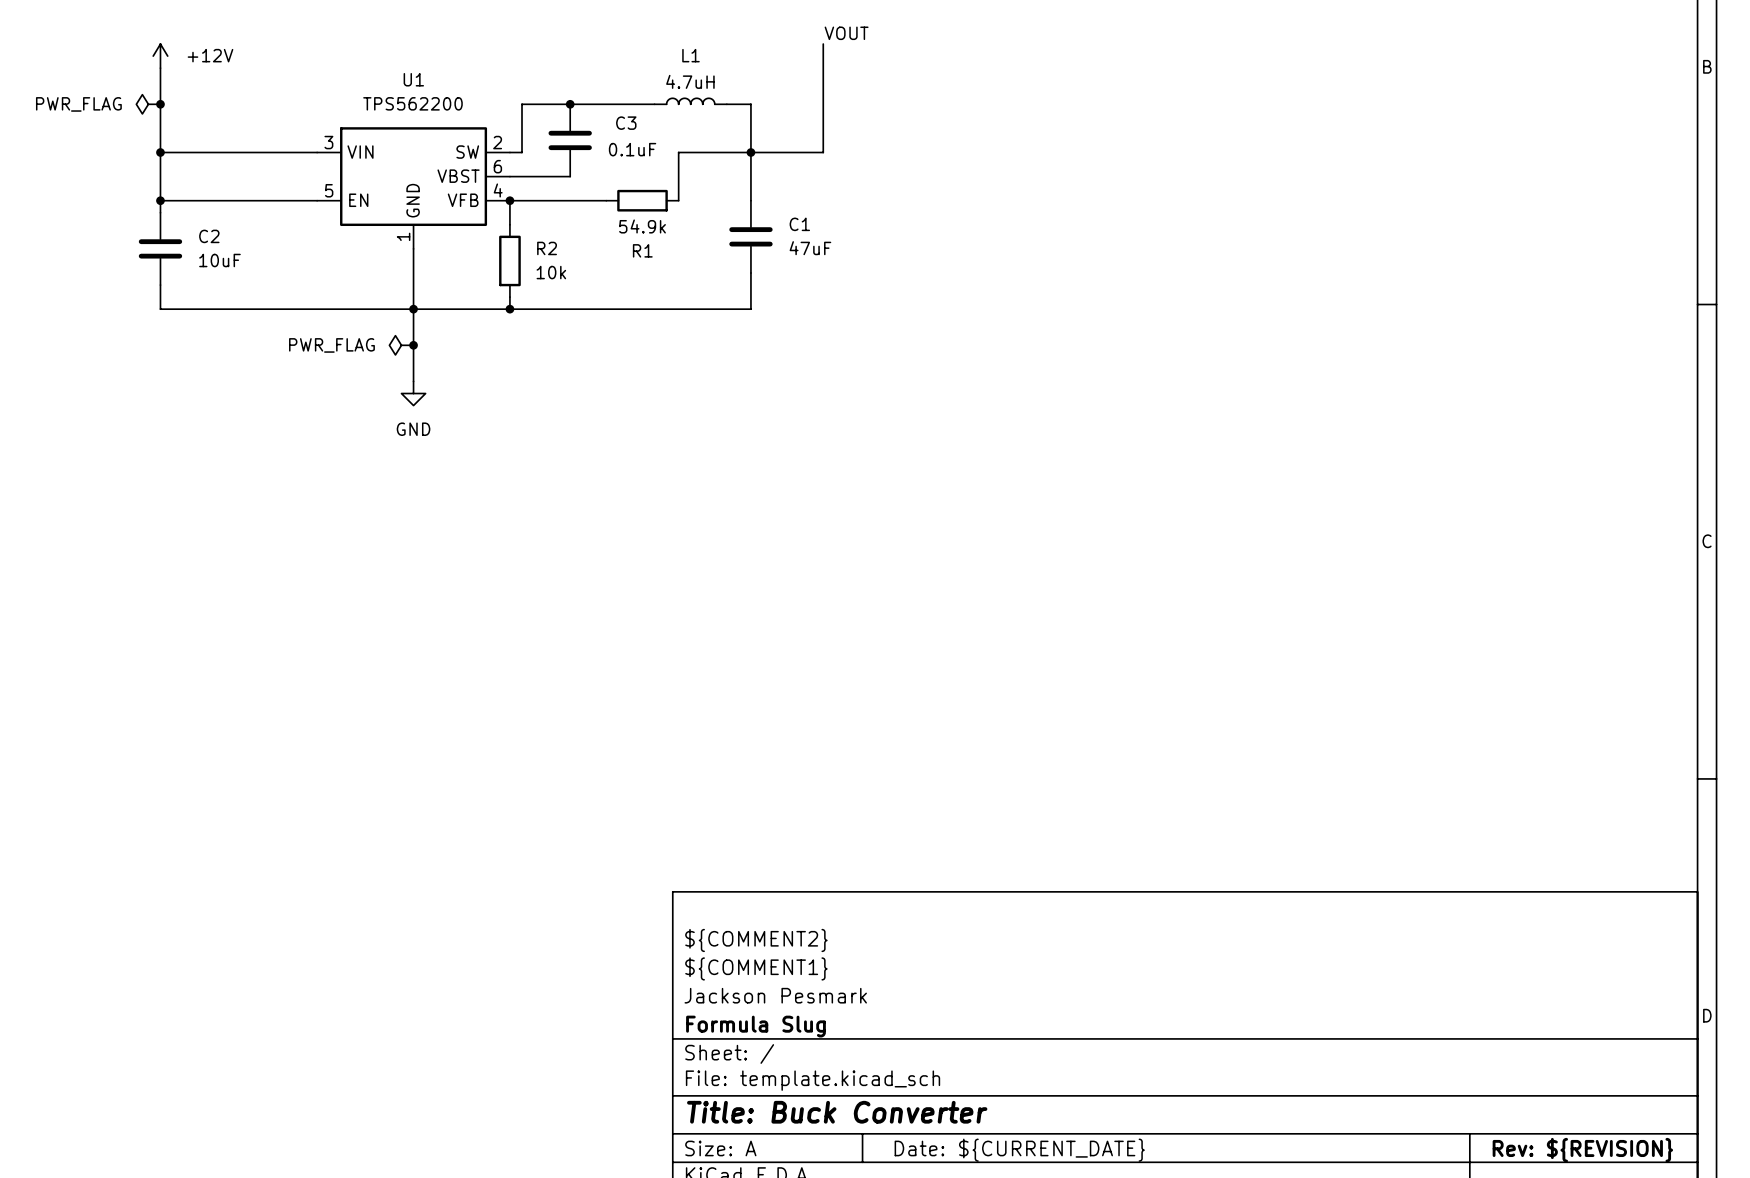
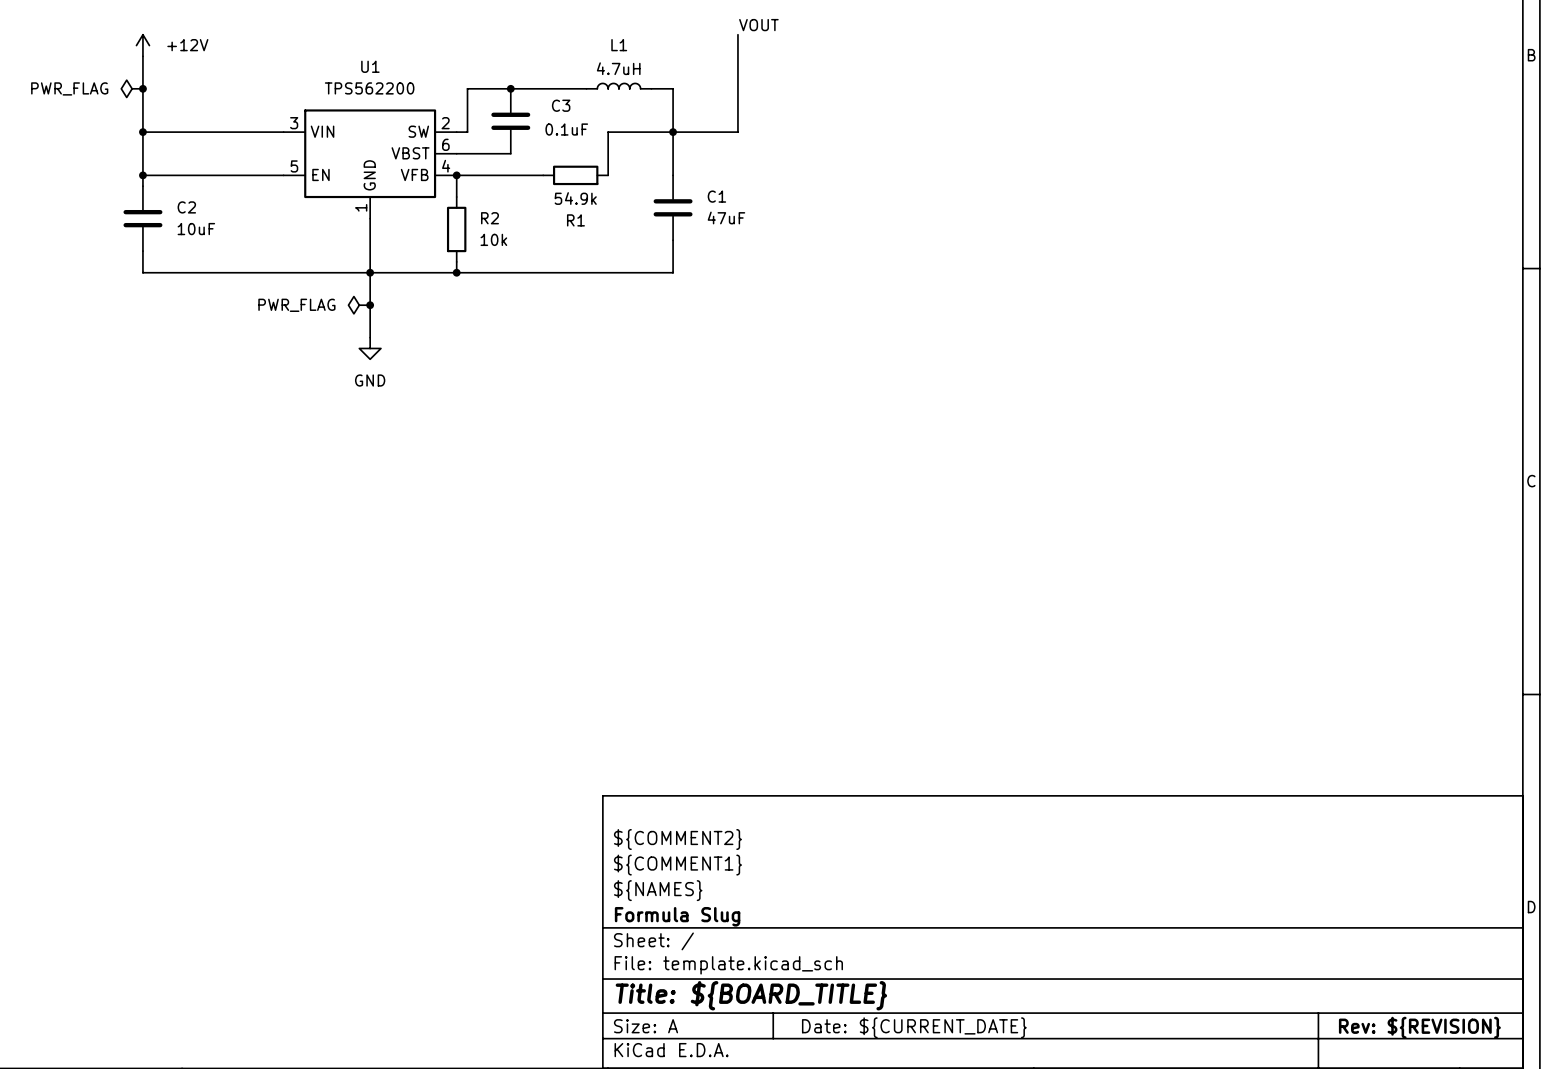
title block: Jackson Pesmark (775, 995) -> ${NAMES} (658, 890)
title block: Title: Buck Converter (837, 1112) -> Title: ${BOARD_TITLE} (751, 995)

